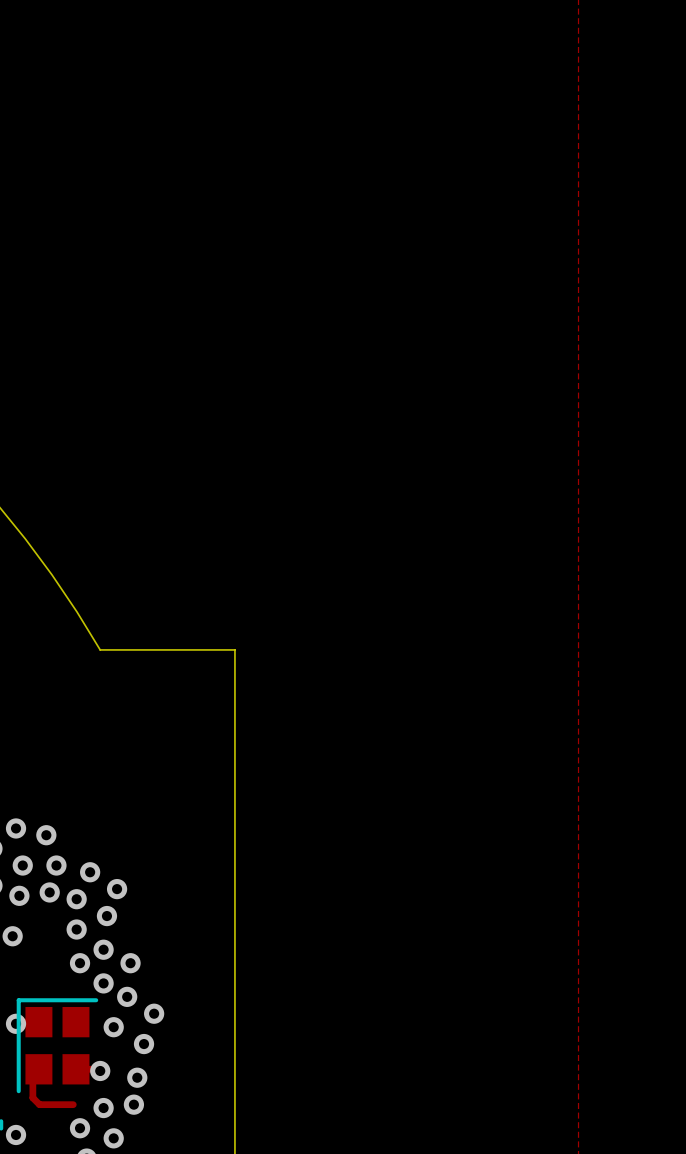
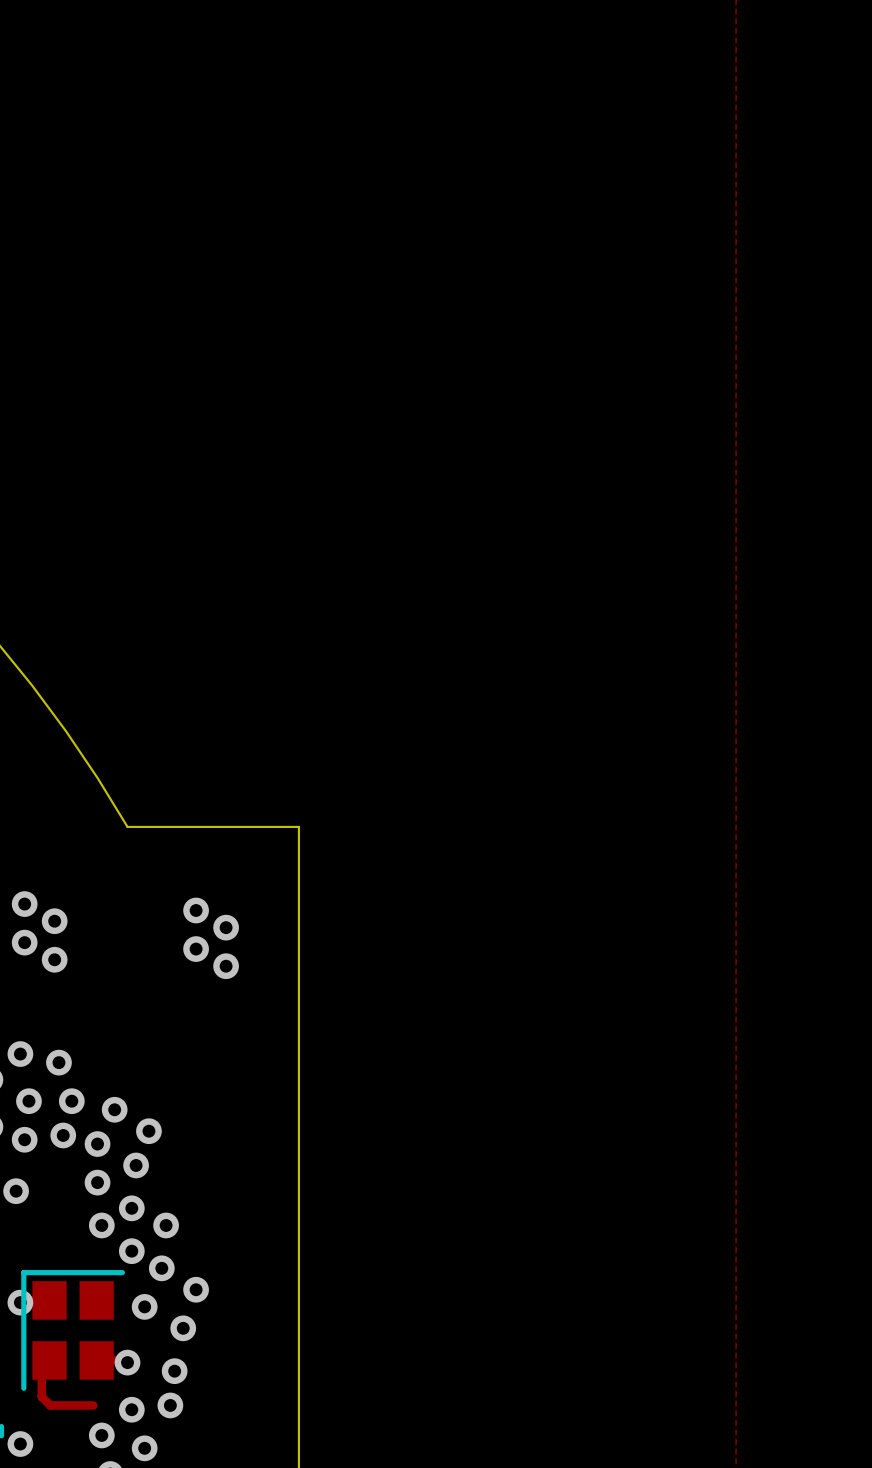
via: none -> (24, 904)
via: none -> (196, 910)
via: none -> (54, 921)
via: none -> (226, 927)
via: none -> (24, 942)
via: none -> (196, 949)
via: none -> (54, 959)
via: none -> (226, 966)

